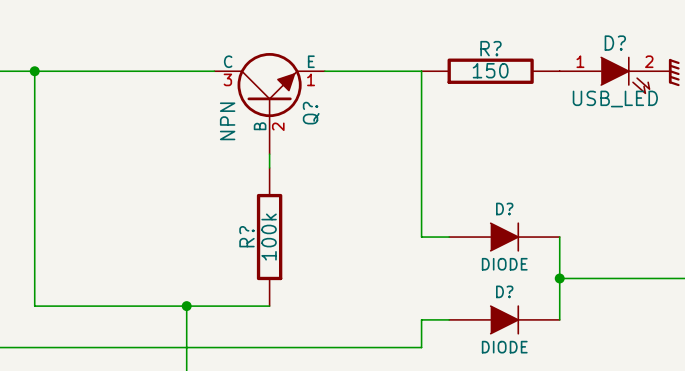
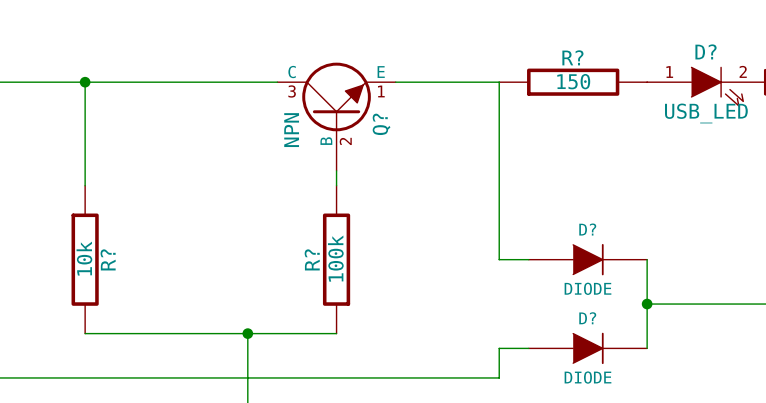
wire: (34, 167) (34, 306) -> none
R?: none -> 10k (85, 259)

